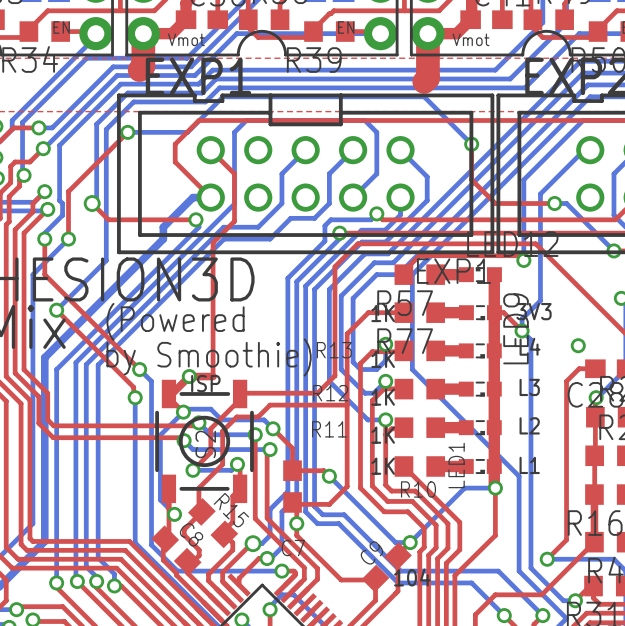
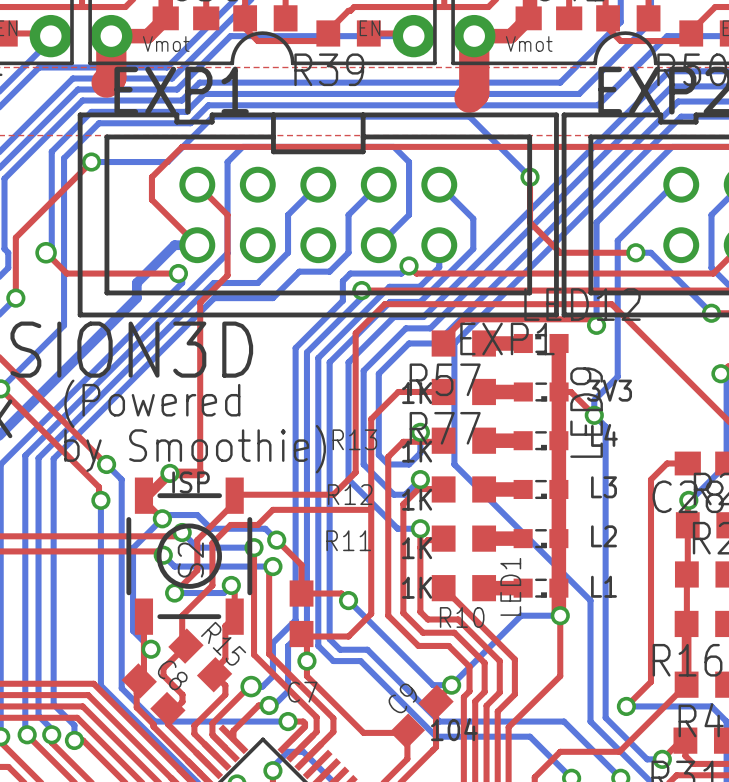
via: (578, 345) -> none

